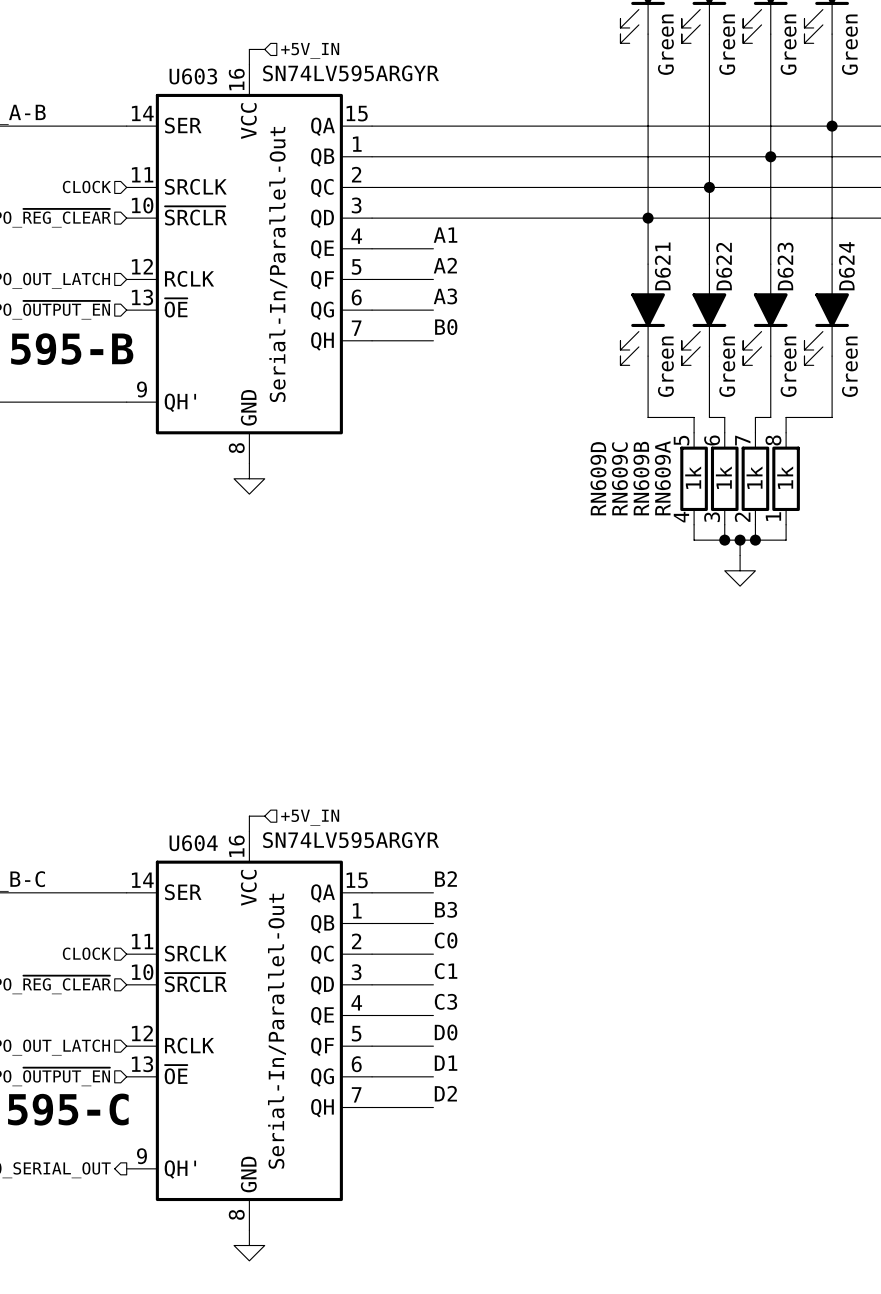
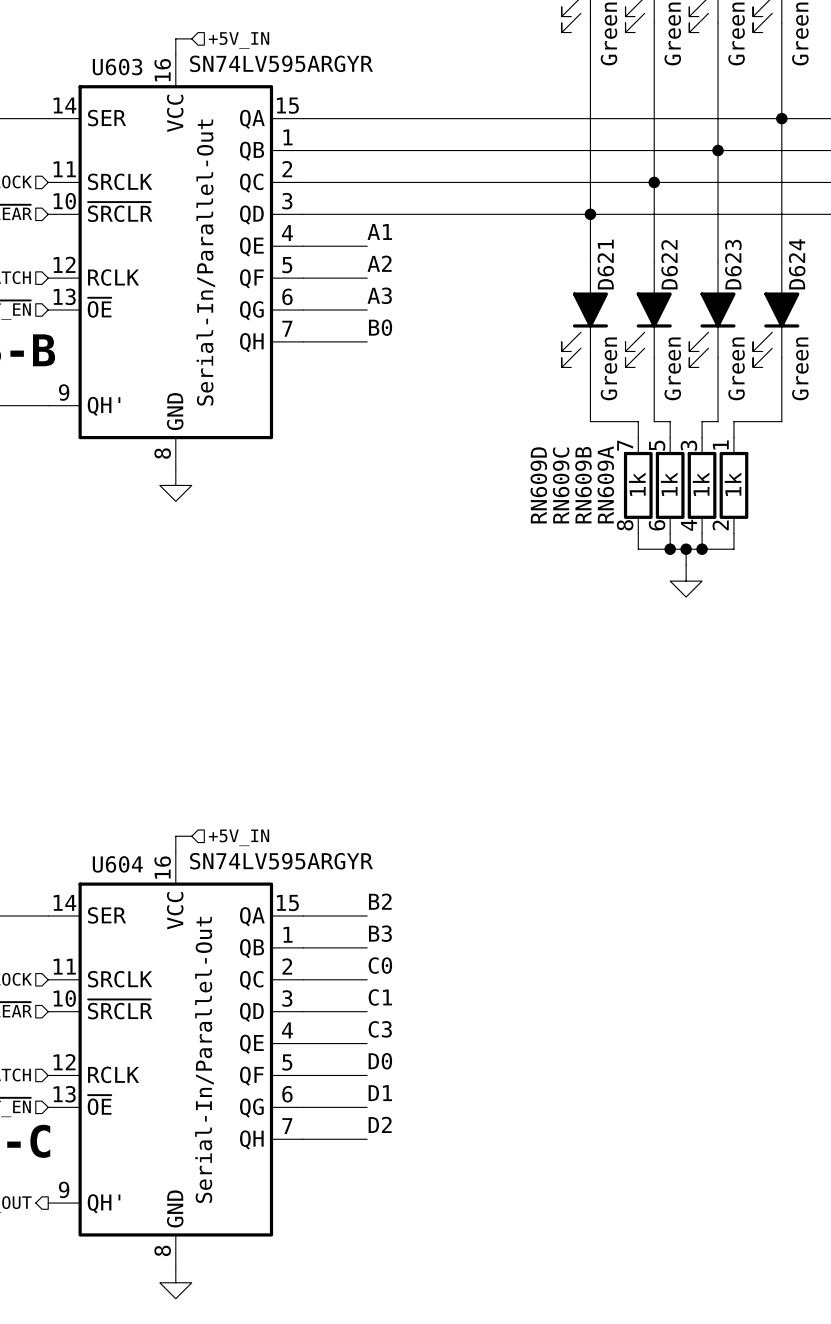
RN609D pin number: 5 (681, 440) -> 7 (625, 445)
RN609C pin number: 6 (712, 440) -> 5 (657, 445)
RN609B pin number: 7 (742, 440) -> 3 (688, 445)
RN609A pin number: 8 (773, 440) -> 1 (720, 444)
RN609A pin number: 1 (773, 516) -> 2 (720, 525)
RN609D pin number: 4 (681, 517) -> 8 (625, 525)
RN609C pin number: 3 (712, 517) -> 6 (657, 525)
RN609B pin number: 2 (742, 517) -> 4 (688, 525)

